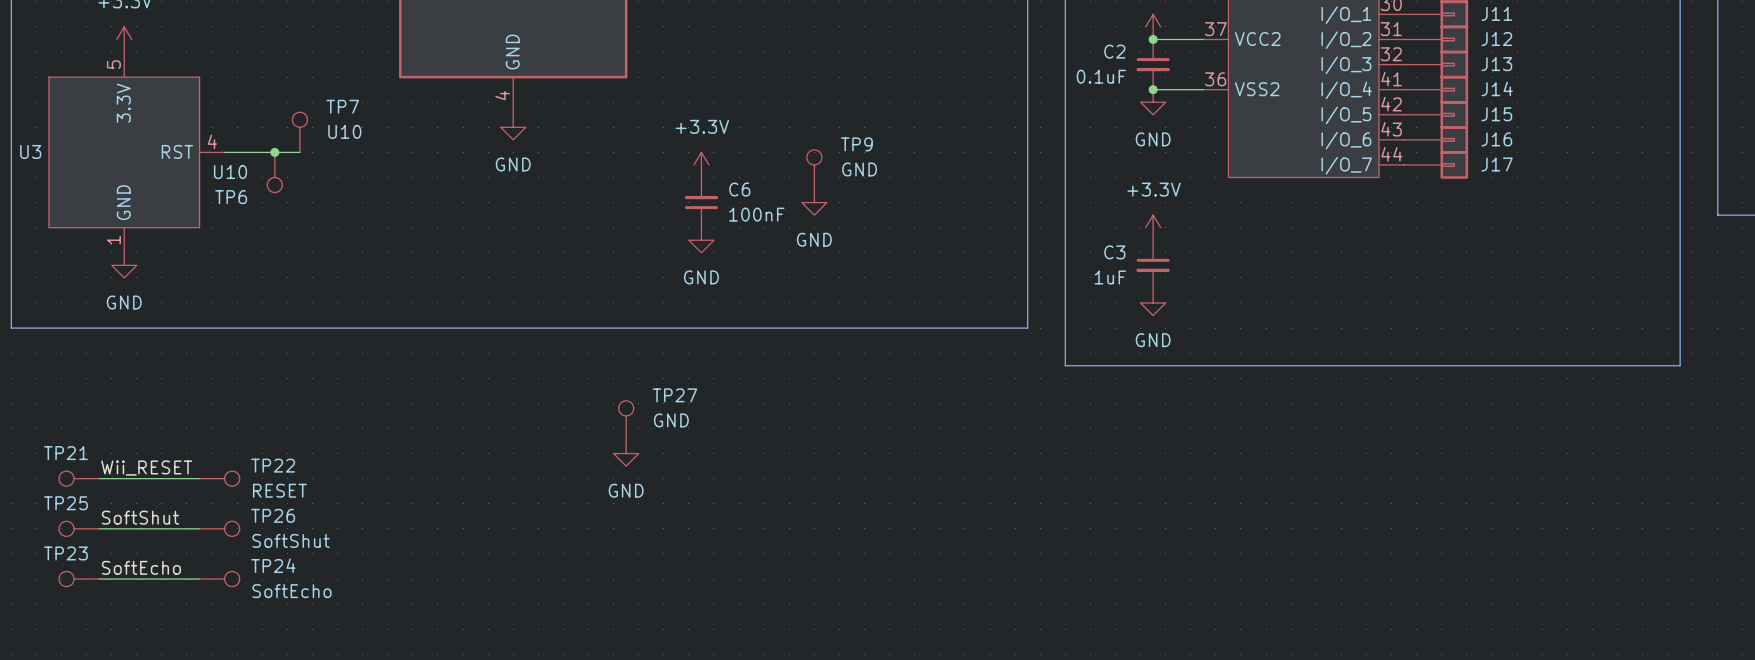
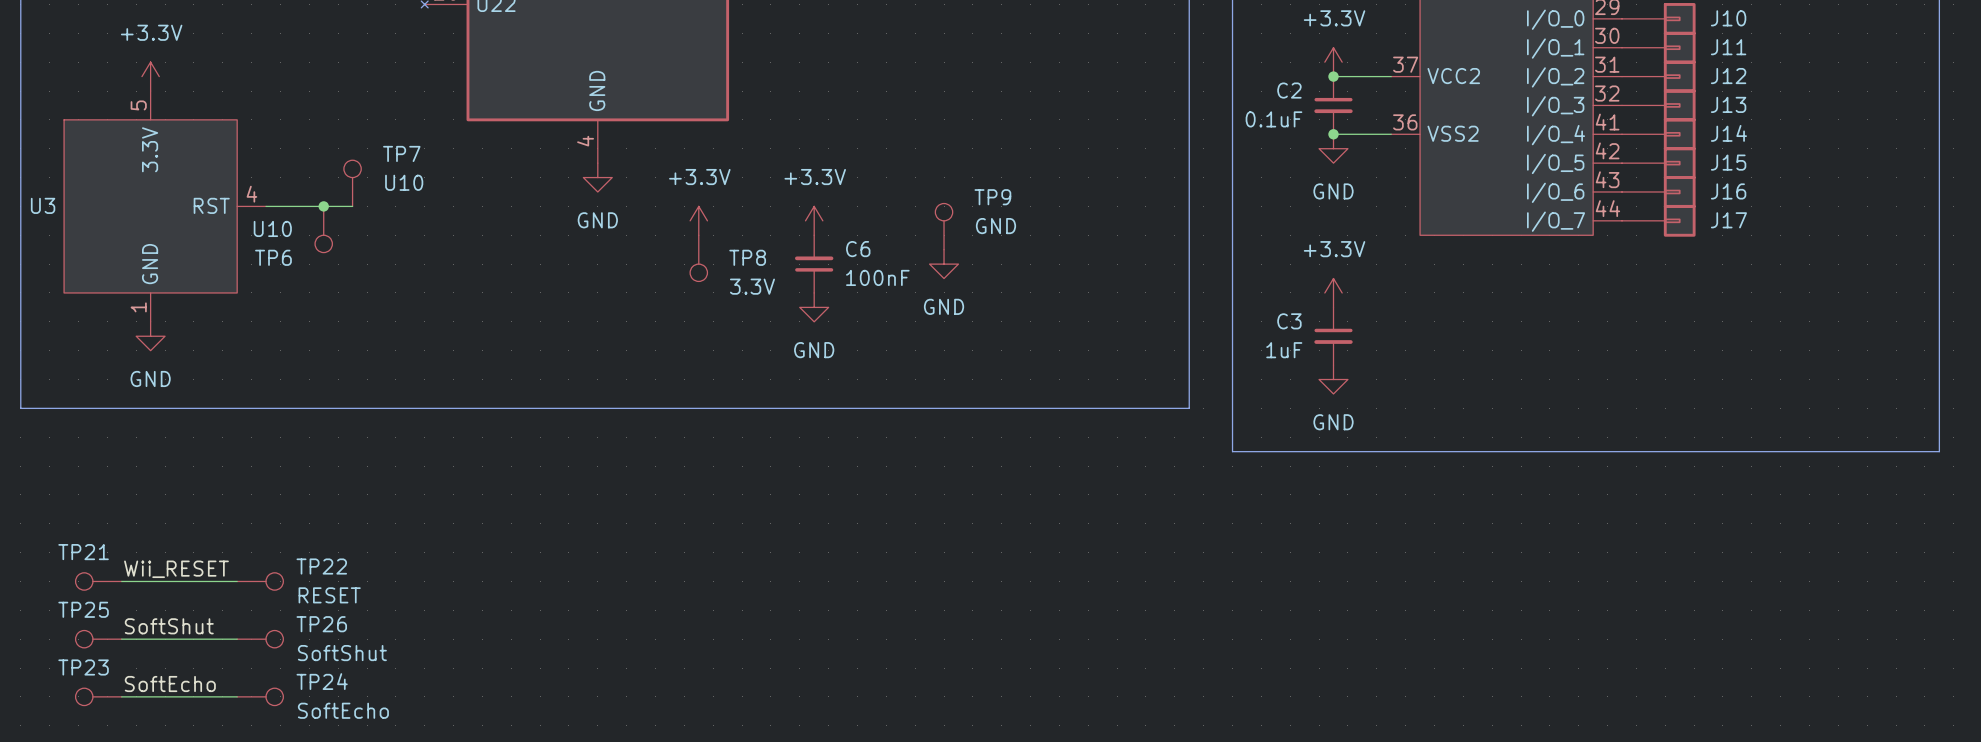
power symbol: none -> +3.3V (698, 220)
TP8: none -> 3.3V (698, 258)
TP27: GND (626, 420) -> none
power symbol: GND (626, 453) -> none

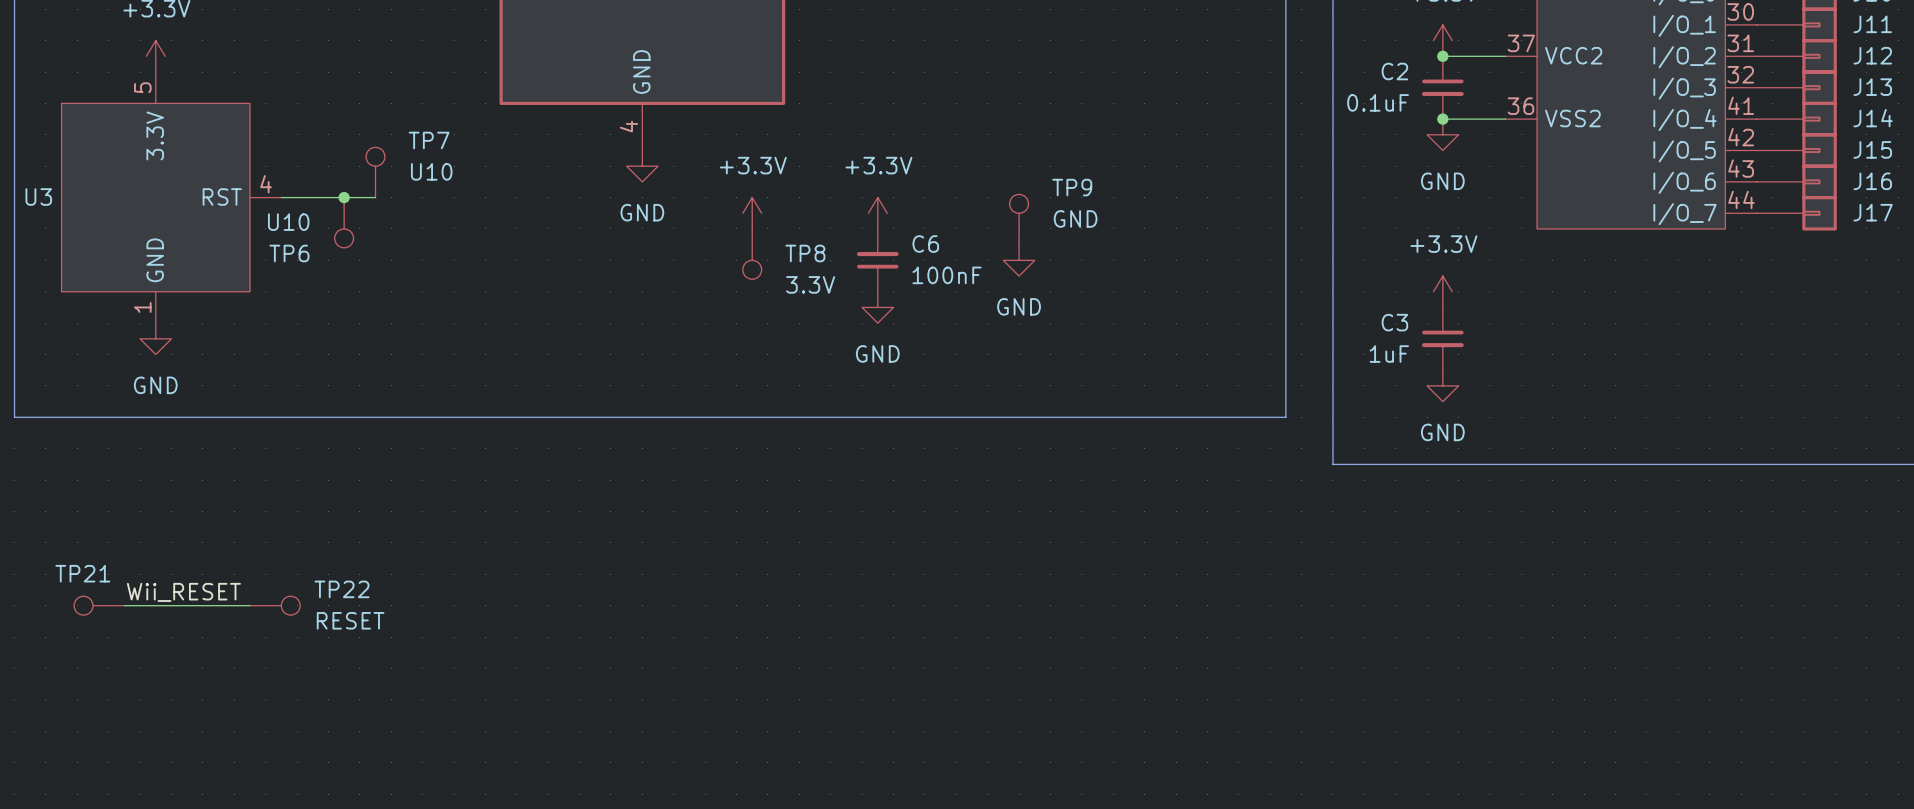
label: SoftShut (169, 626) -> none
TP25: (98, 639) -> none
wire: (121, 639) (237, 639) -> none
TP26: SoftShut (260, 639) -> none
label: SoftEcho (170, 684) -> none
TP23: (98, 696) -> none
wire: (121, 696) (237, 696) -> none
TP24: SoftEcho (260, 696) -> none

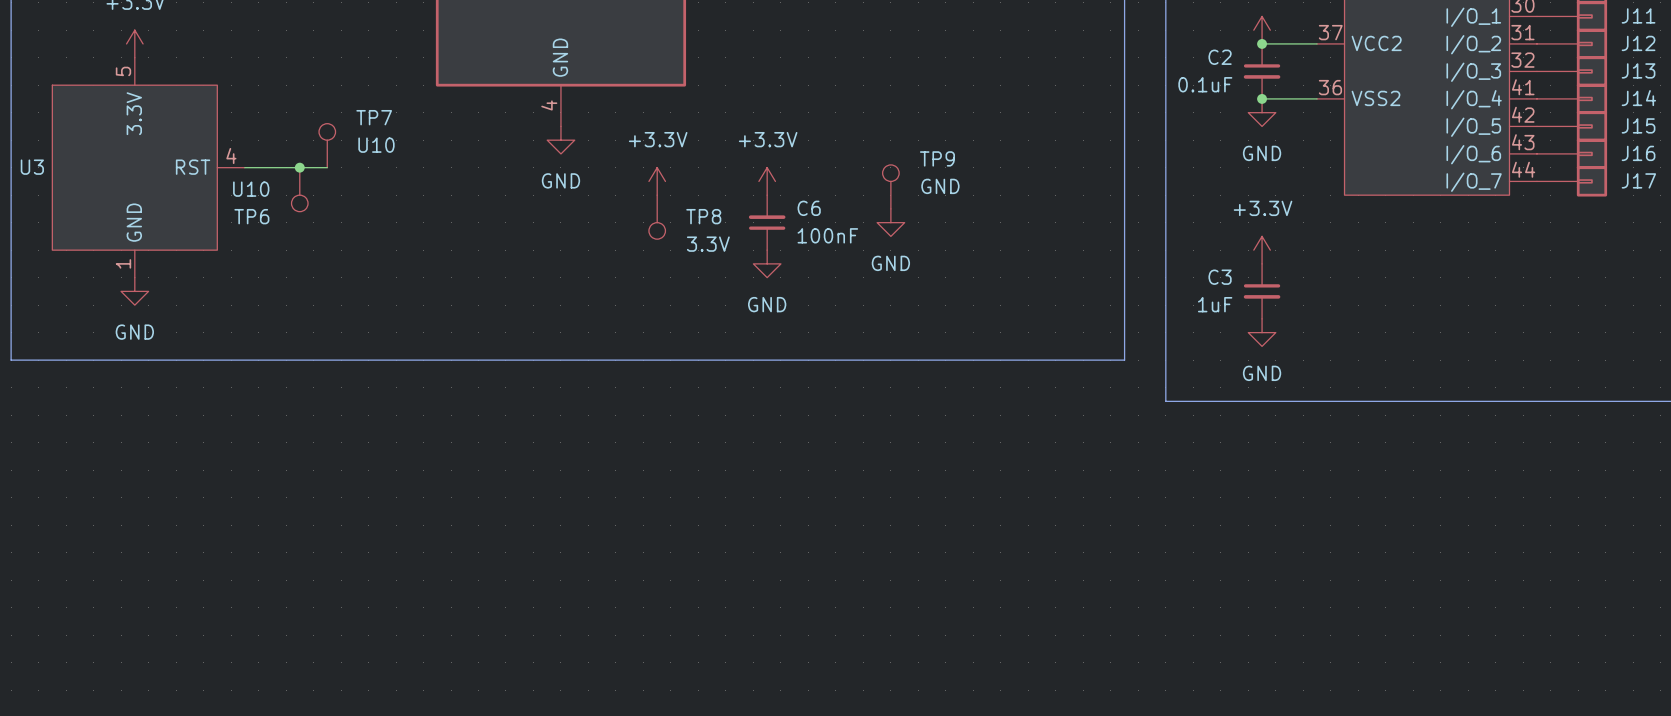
label: Wii_RESET (183, 592) -> none
TP21: (99, 605) -> none
wire: (124, 605) (249, 605) -> none
TP22: RESET (275, 605) -> none

